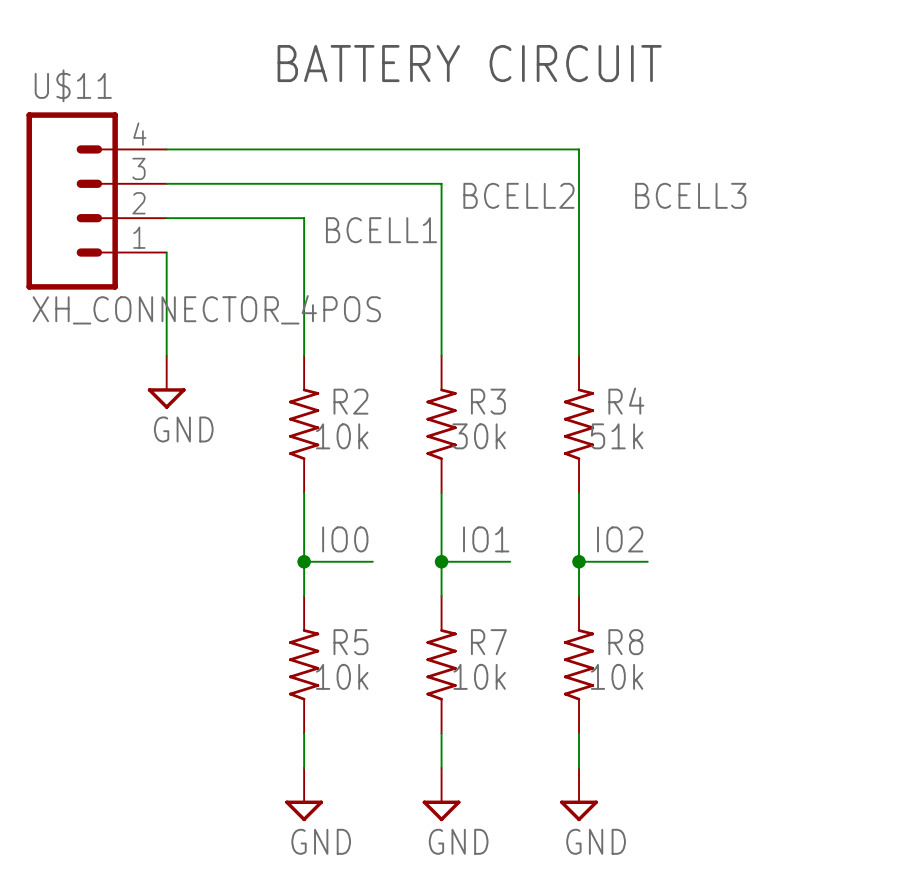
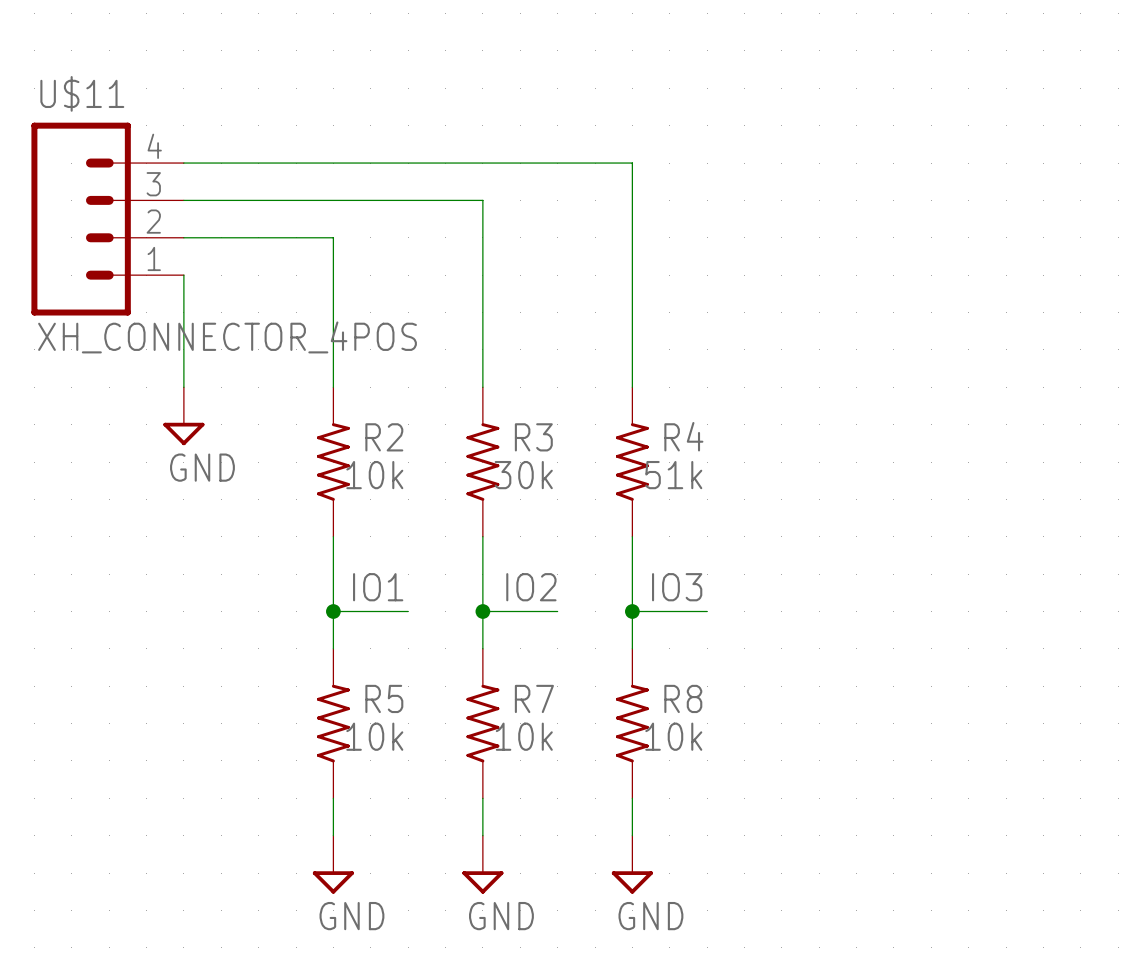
text: BATTERY CIRCUIT (469, 63) -> none
label: BCELL2 (518, 195) -> none
label: BCELL3 (690, 195) -> none
label: BCELL1 (381, 230) -> none
label: IO0 (345, 539) -> IO1 (378, 587)
label: IO1 (486, 539) -> IO2 (531, 587)
label: IO2 (620, 539) -> IO3 (677, 587)

